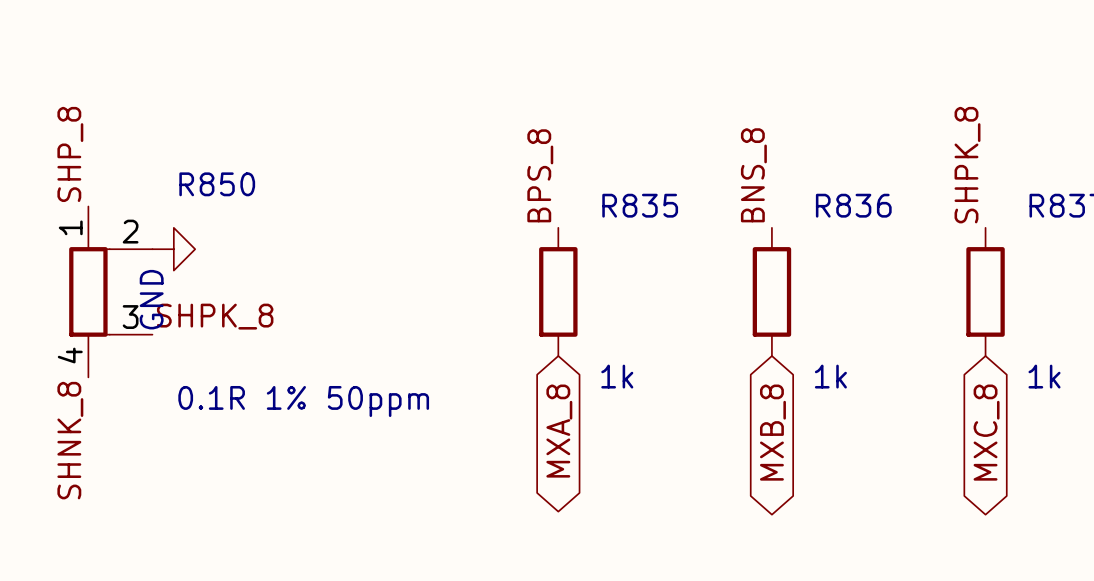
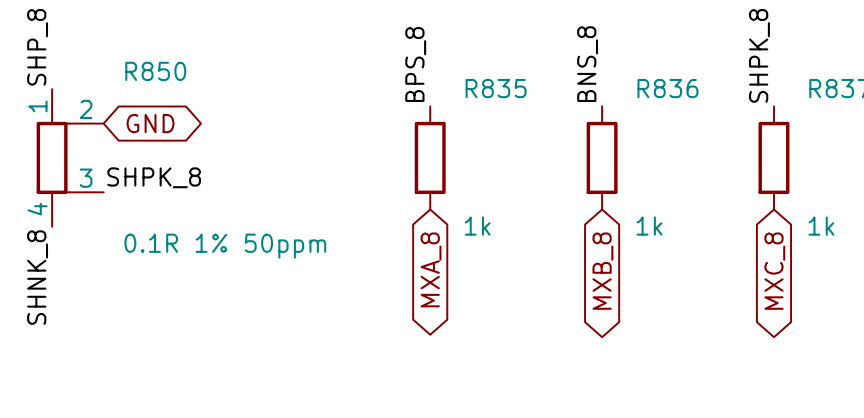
power symbol: GND (173, 249) -> none
global label: none -> GND (150, 123)

